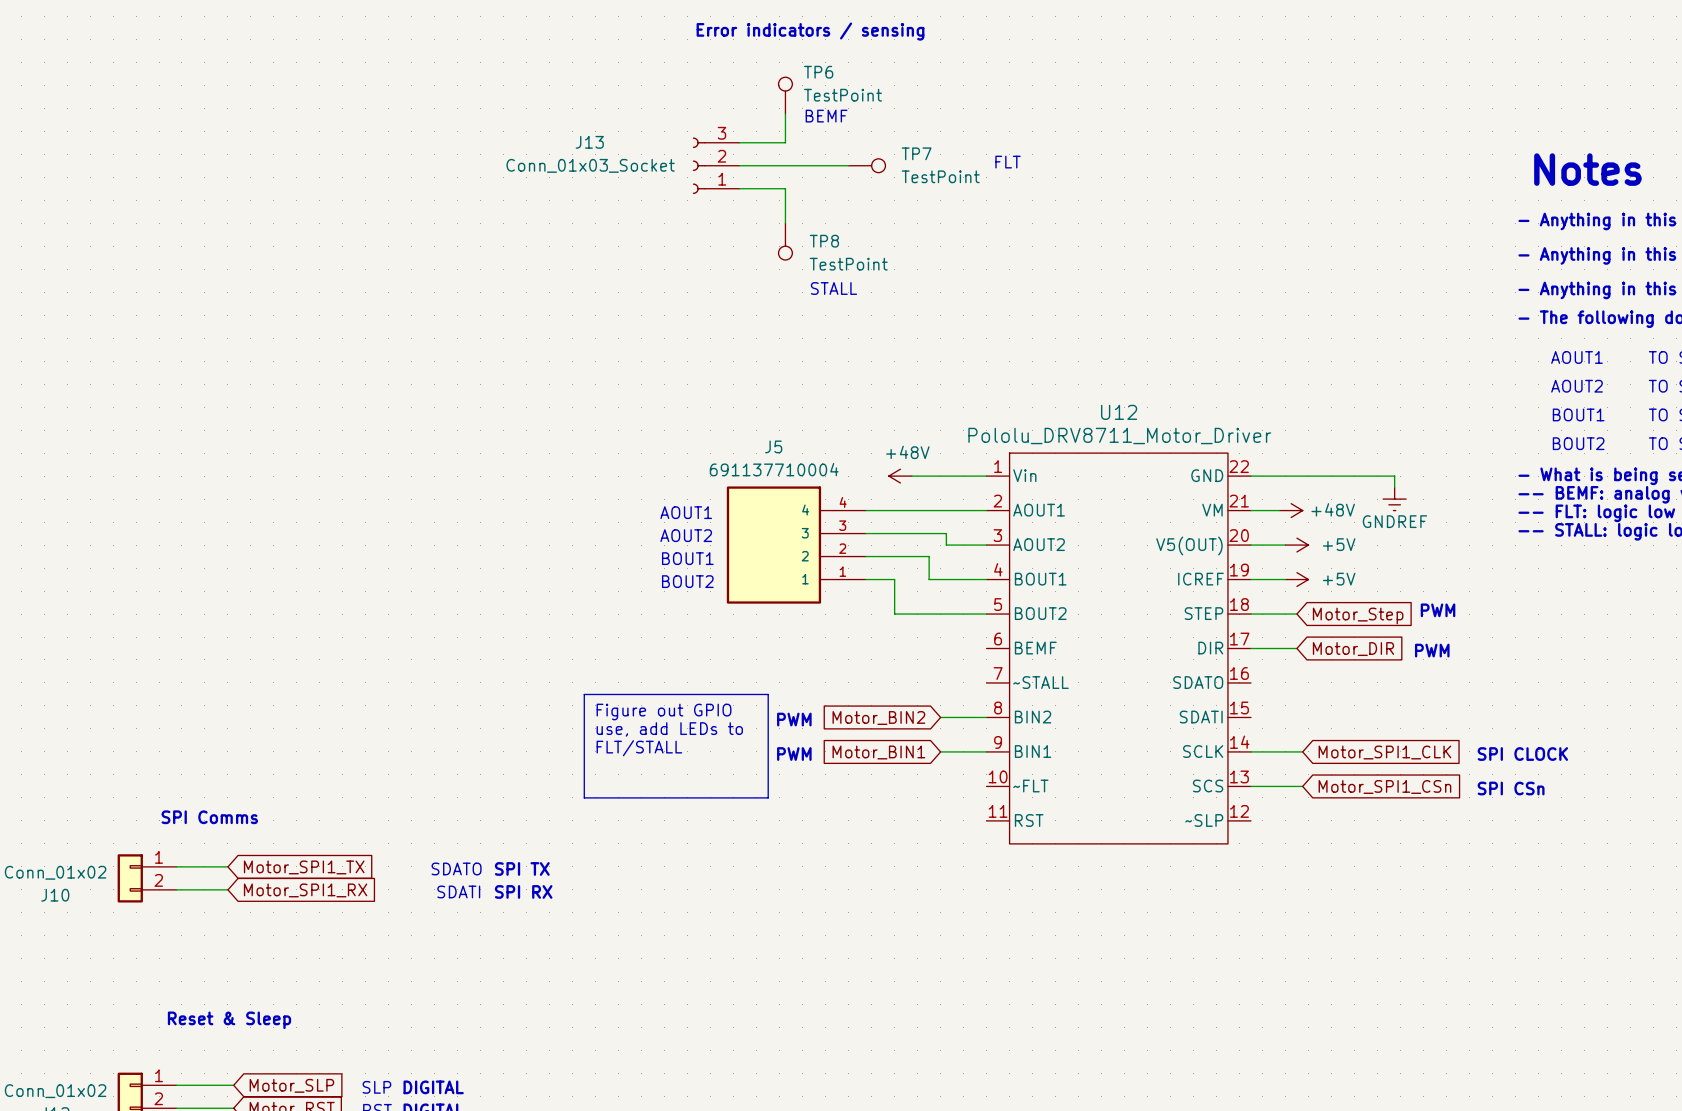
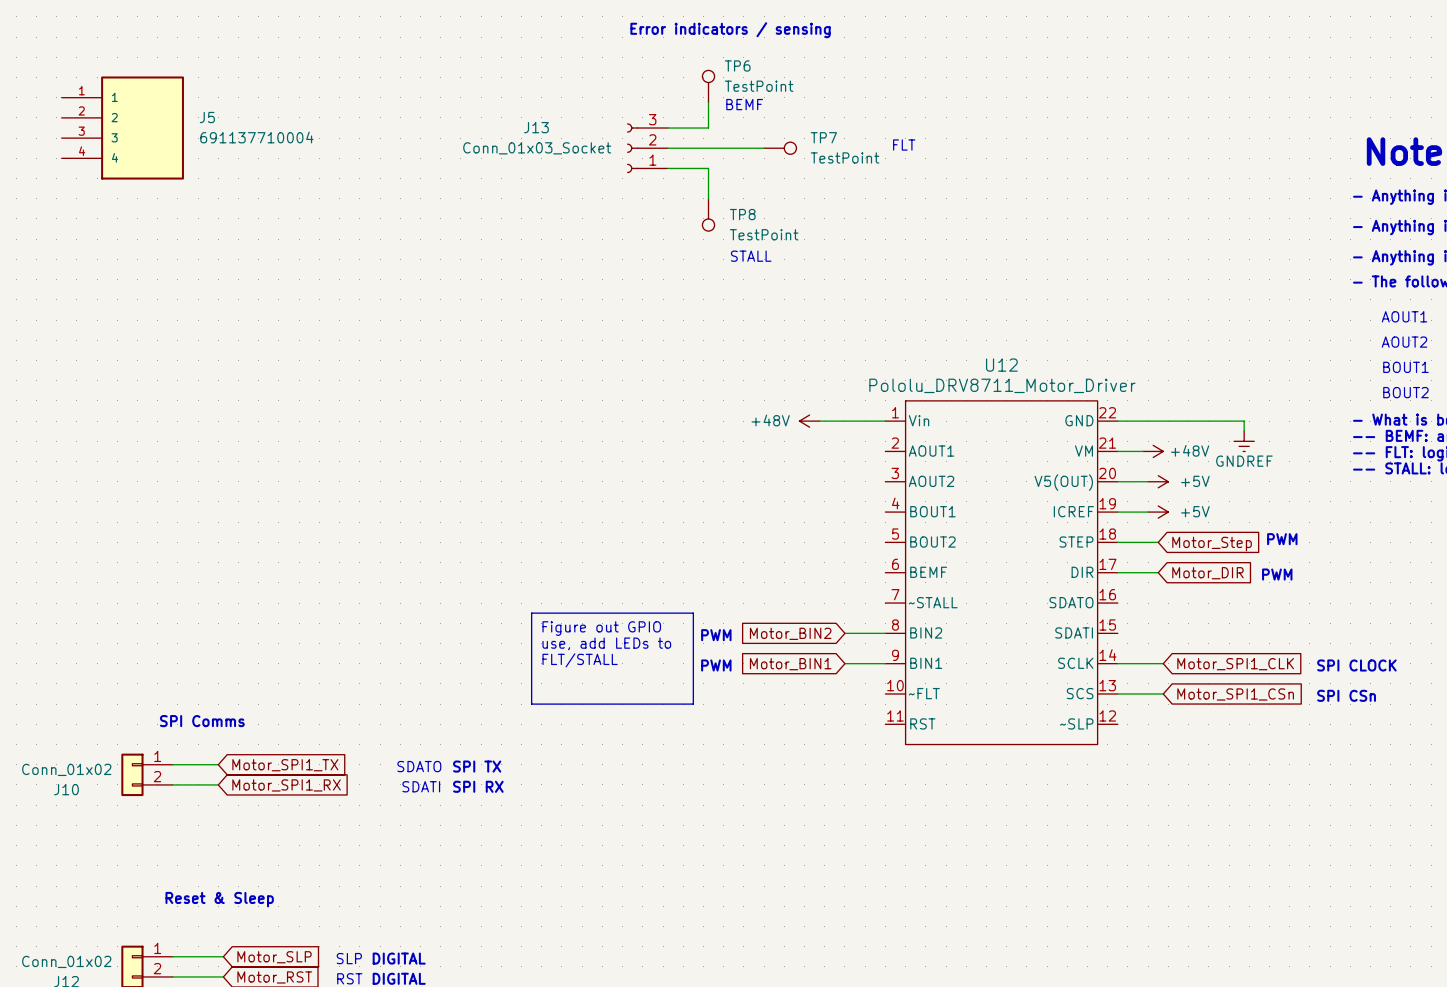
J5 name position: J5 (773, 446) -> J5 (207, 117)
power symbol text position: +48V (907, 452) -> +48V (770, 420)
J5 value position: 691137710004 (774, 469) -> 691137710004 (256, 137)
wire: (865, 510) (986, 510) -> none
text: AOUT1 (686, 512) -> none
wire: (865, 533) (946, 533) (946, 545) (986, 545) -> none
text: AOUT2 (686, 535) -> none
J5 rotation: 0° (773, 545) -> 180° (142, 128)
J5 position: (796, 545) -> (122, 128)
wire: (865, 556) (929, 556) (929, 579) (986, 579) -> none
text: BOUT1 (687, 558) -> none
wire: (865, 579) (894, 579) (894, 614) (986, 614) -> none
text: BOUT2 (687, 581) -> none

